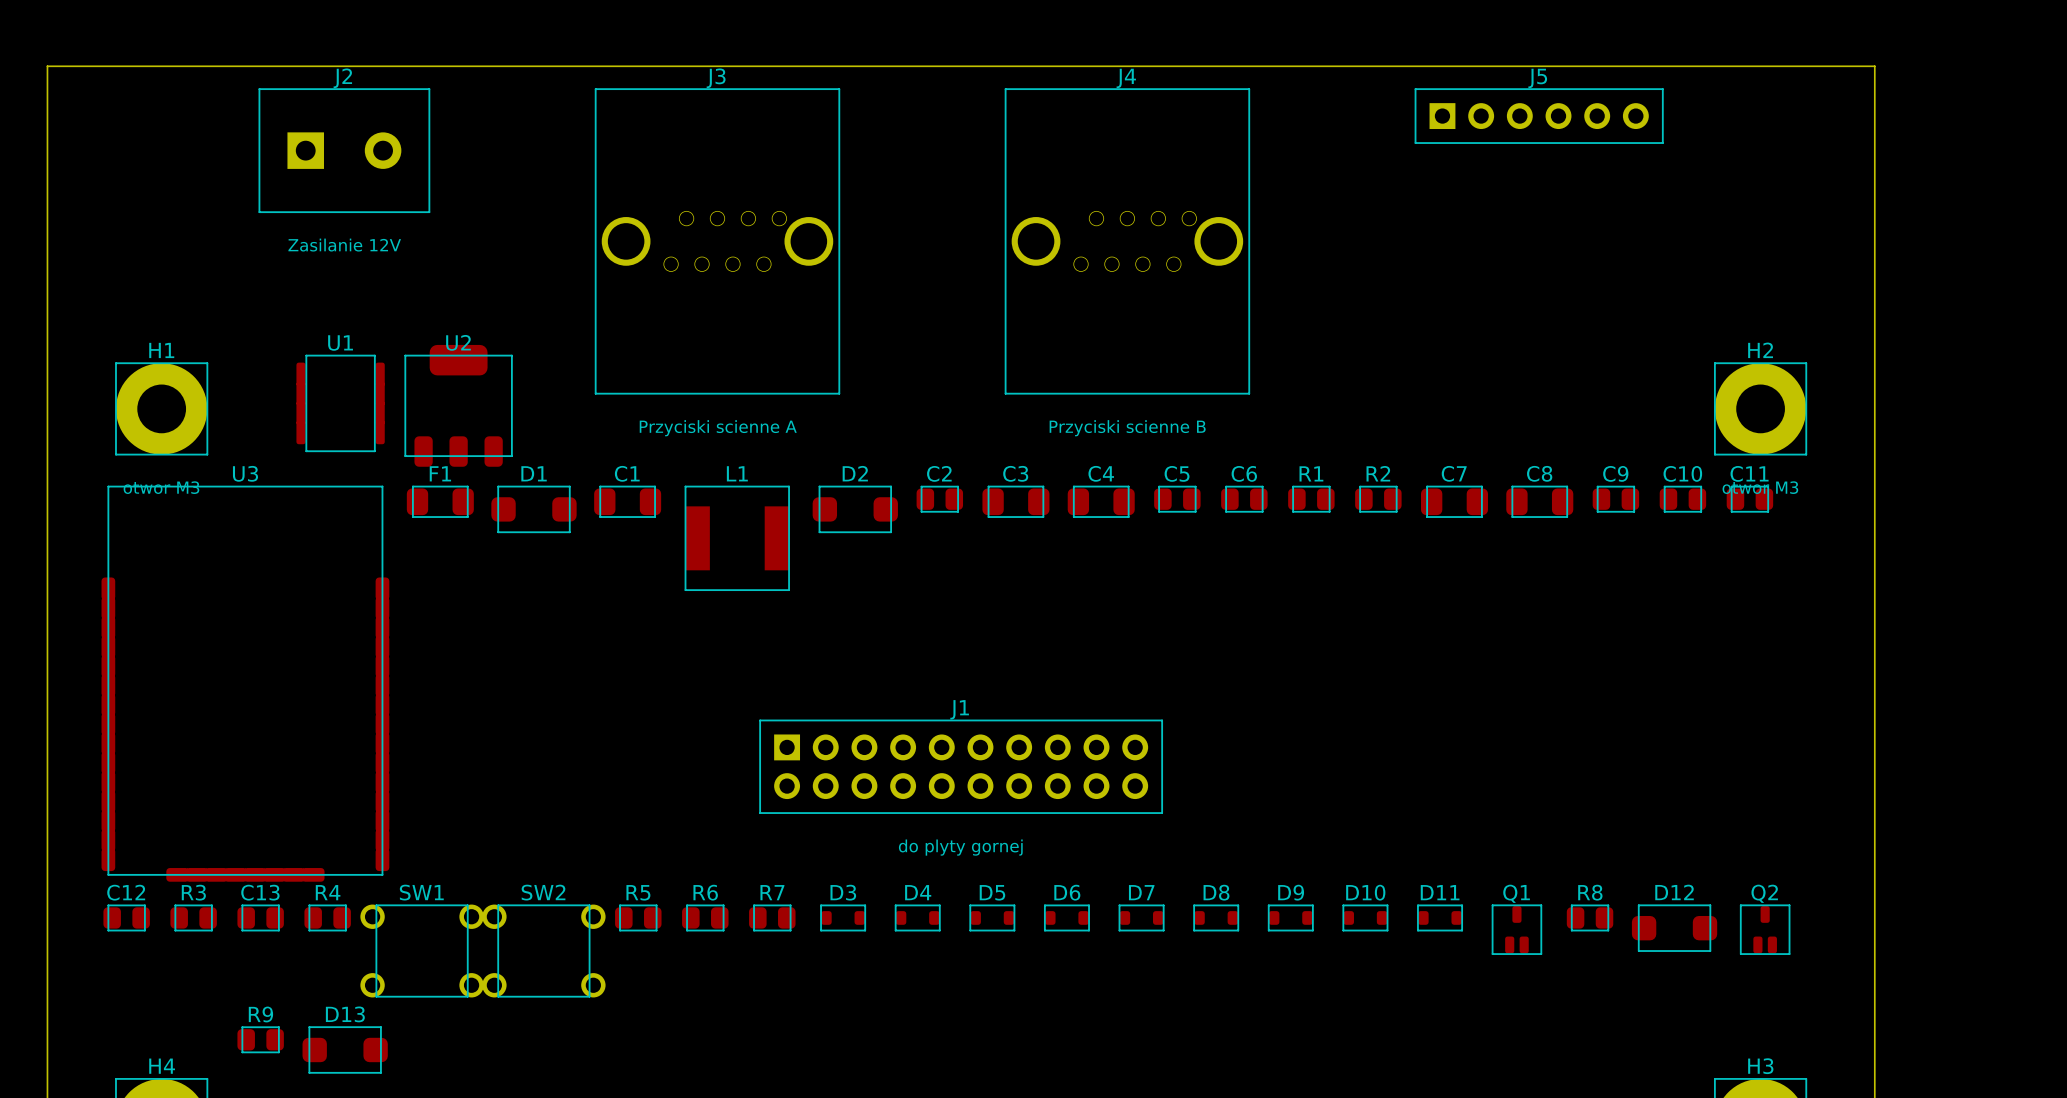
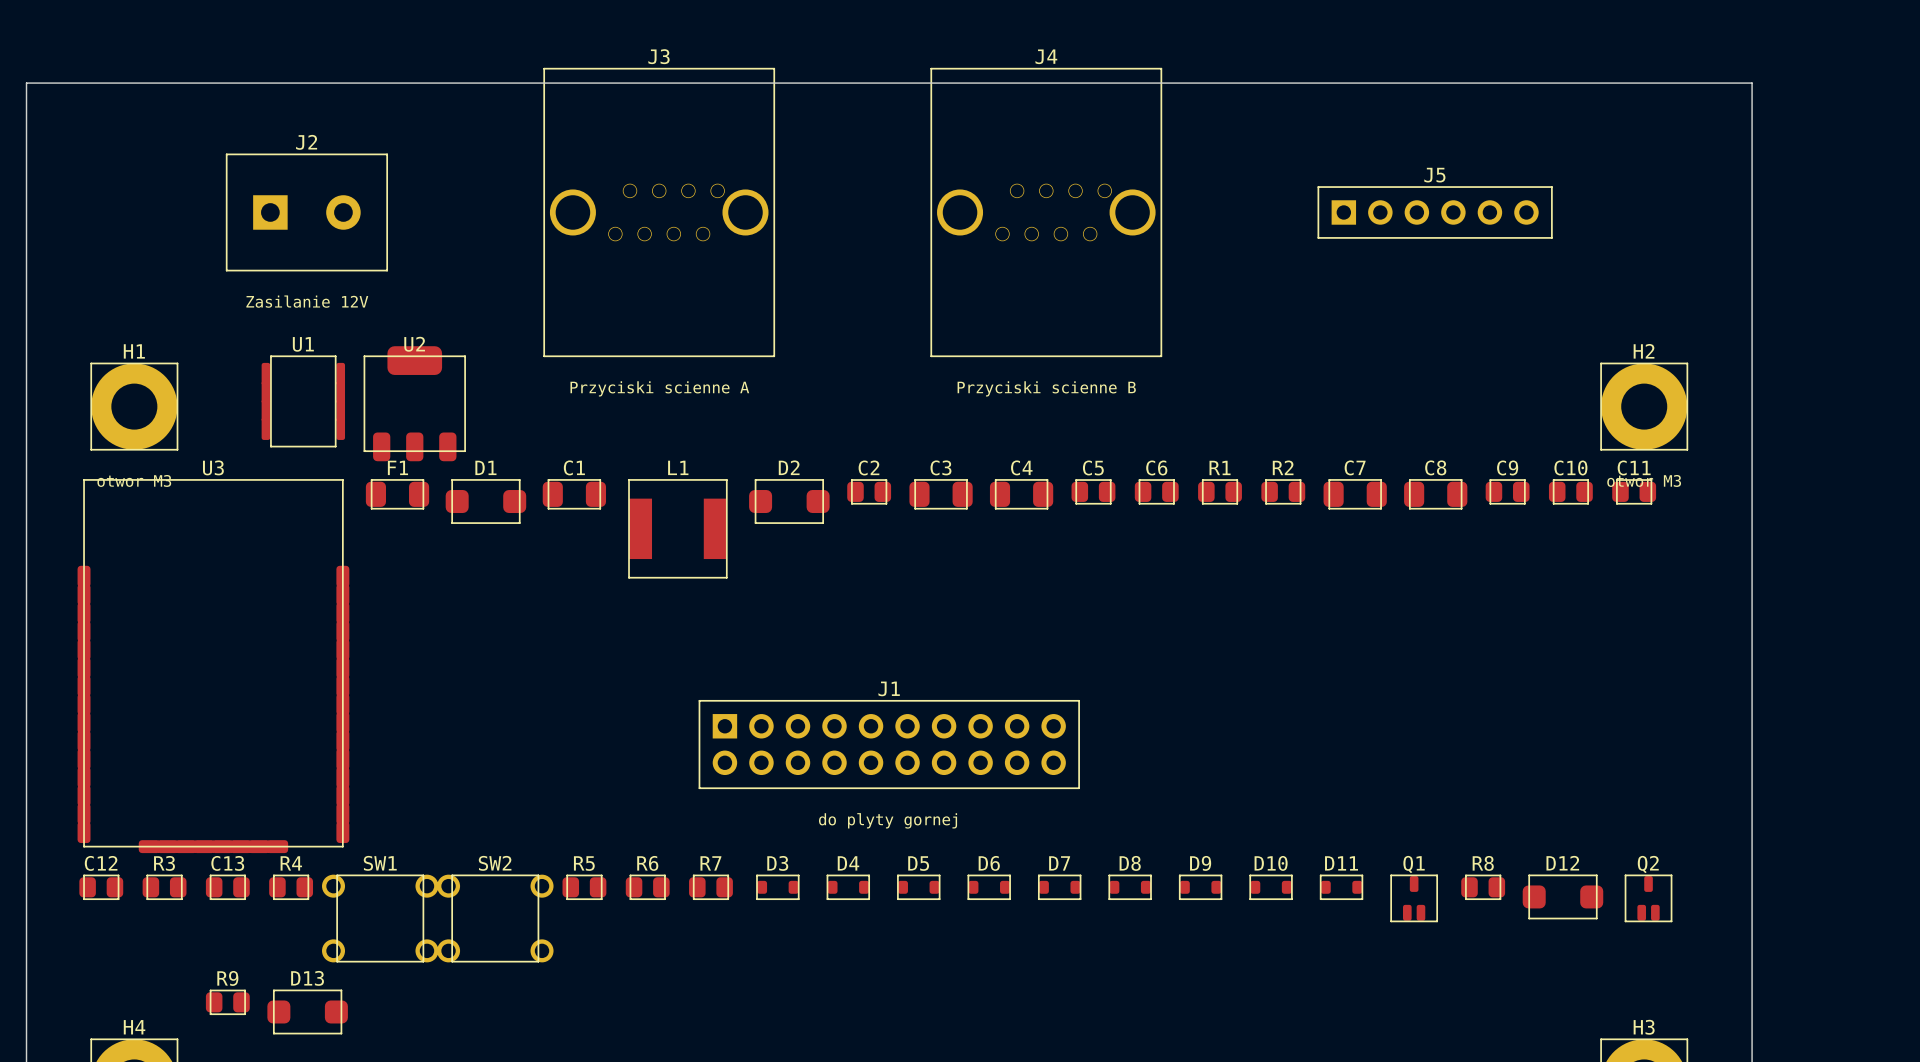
J5 position: (1539, 116) -> (1435, 212)
J2 position: (344, 150) -> (306, 212)
J3 position: (717, 241) -> (659, 212)
J4 position: (1127, 241) -> (1046, 212)

